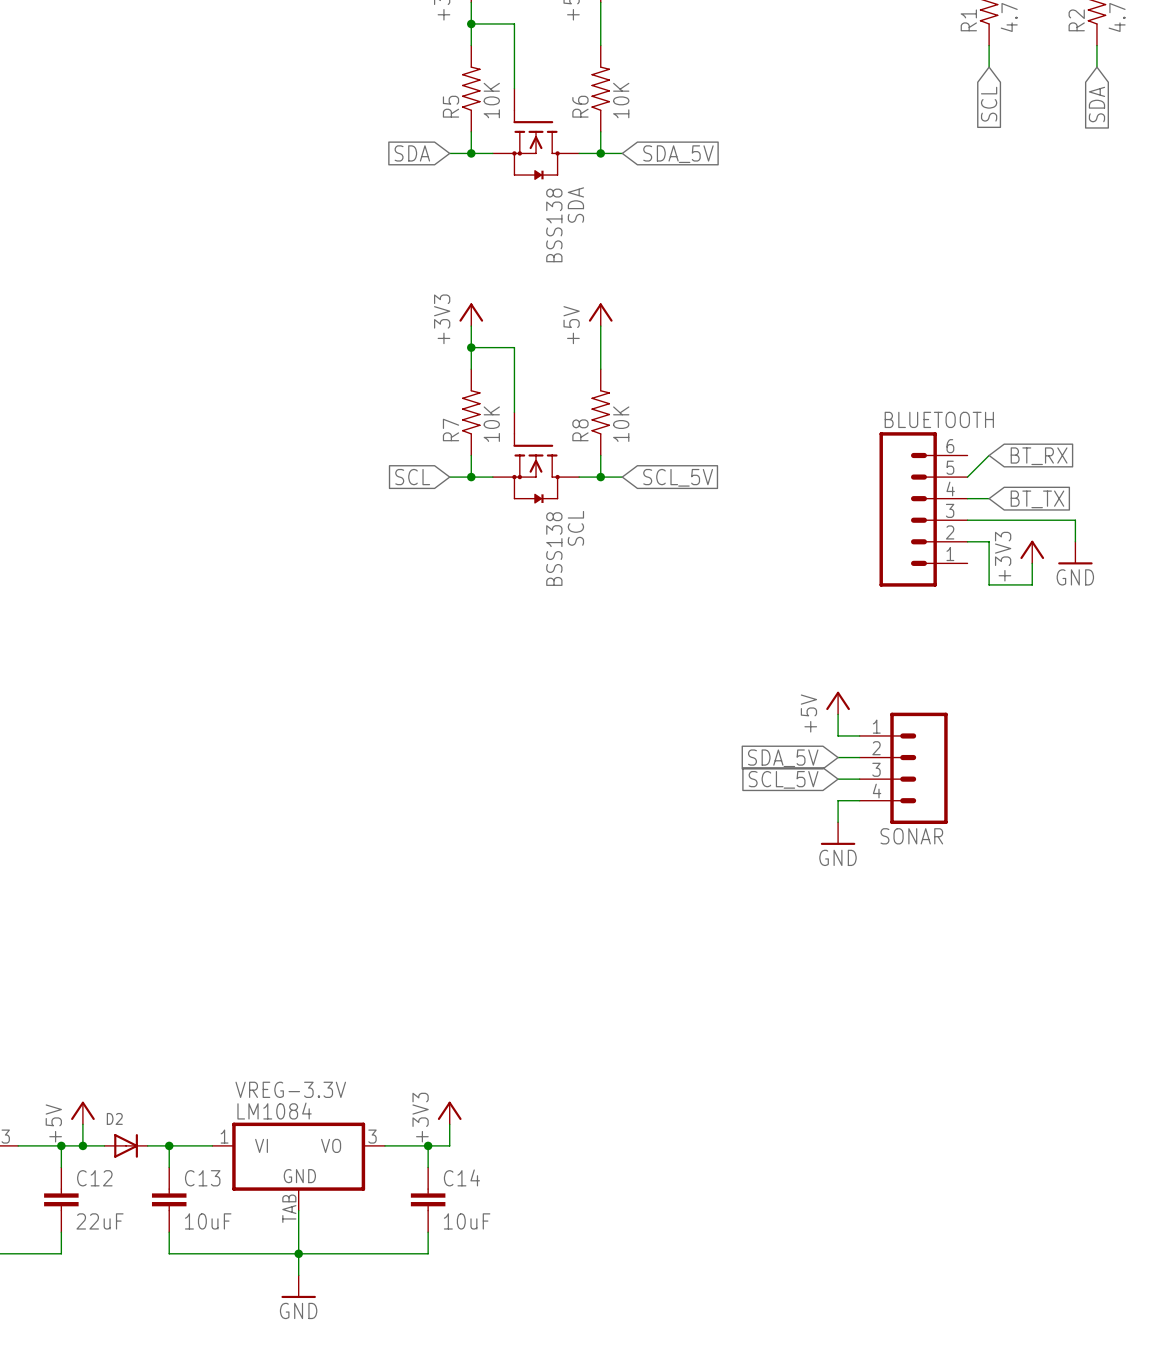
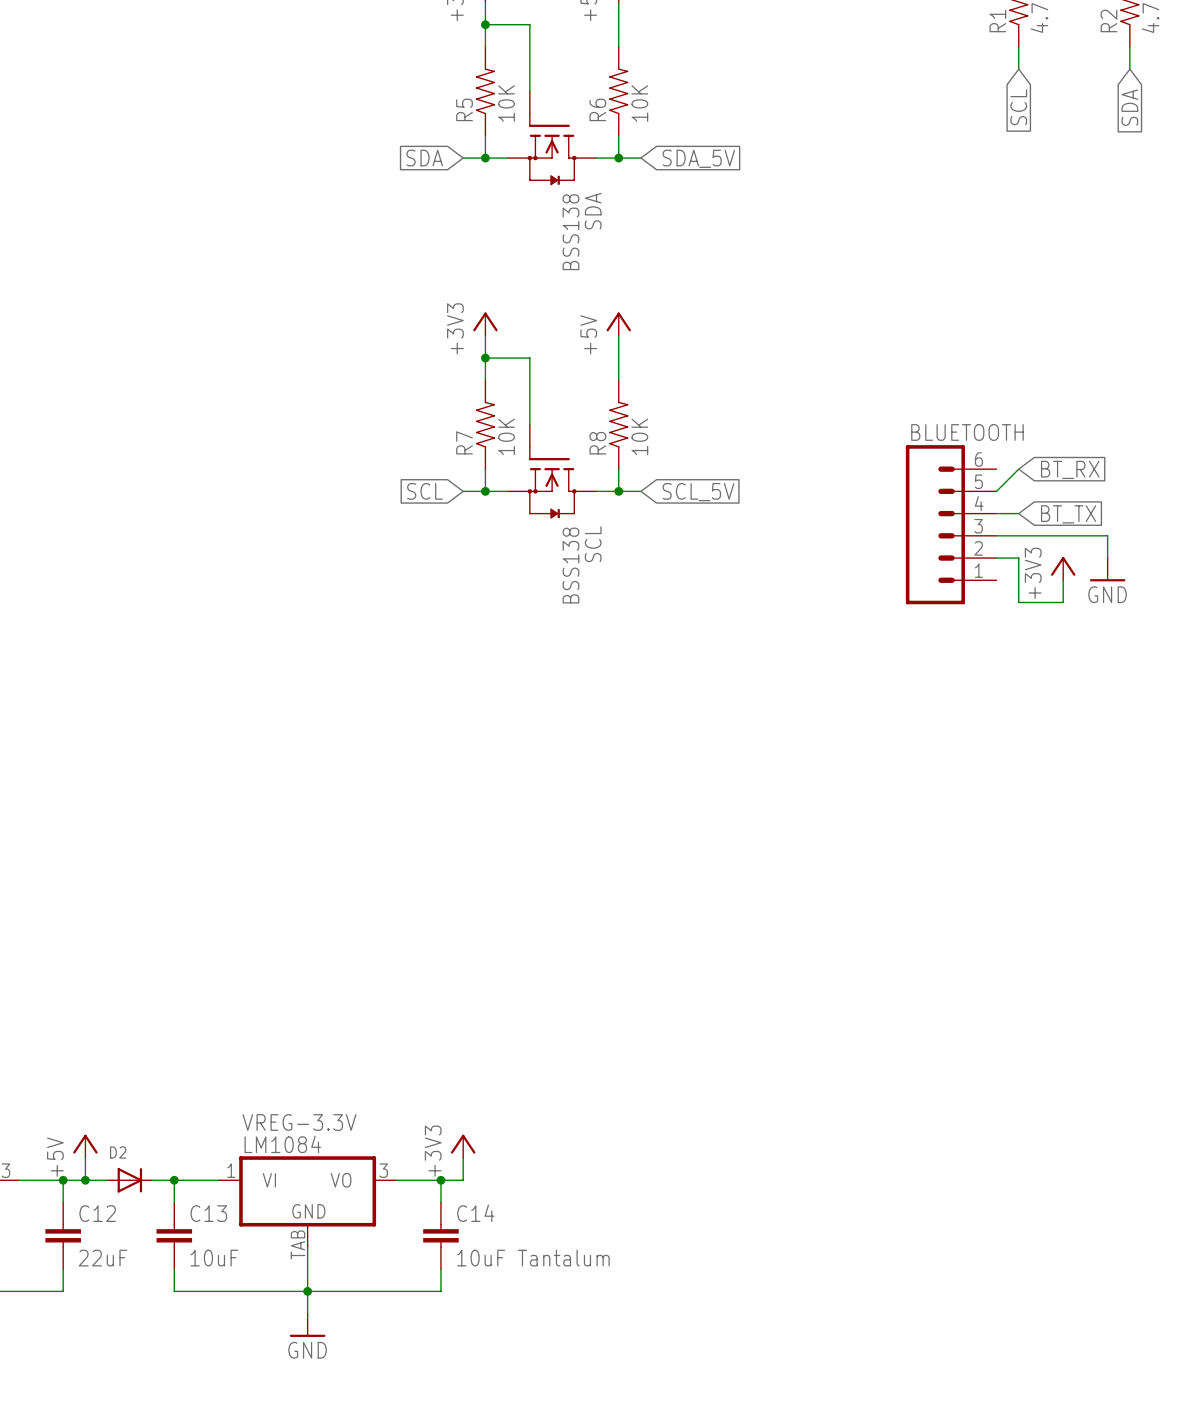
power symbol: +5V (838, 703) -> none
wire: (838, 714) (838, 735) (859, 735) -> none
wire: (838, 757) (859, 757) -> none
global label: SDA_5V (783, 758) -> none
SONAR: (903, 768) -> none
global label: SCL_5V (783, 779) -> none
wire: (838, 779) (859, 779) -> none
wire: (859, 800) (838, 800) (838, 822) -> none
power symbol: GND (838, 833) -> none
C14 value: 10uF (467, 1221) -> 10uF Tantalum (533, 1258)

